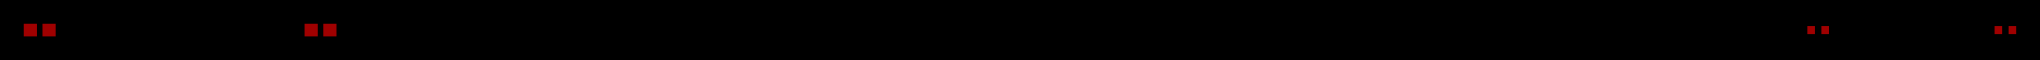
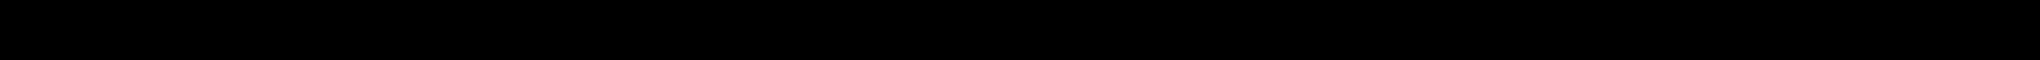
part: (39, 30) -> none
part: (320, 30) -> none
part: (1818, 30) -> none
part: (2005, 30) -> none

